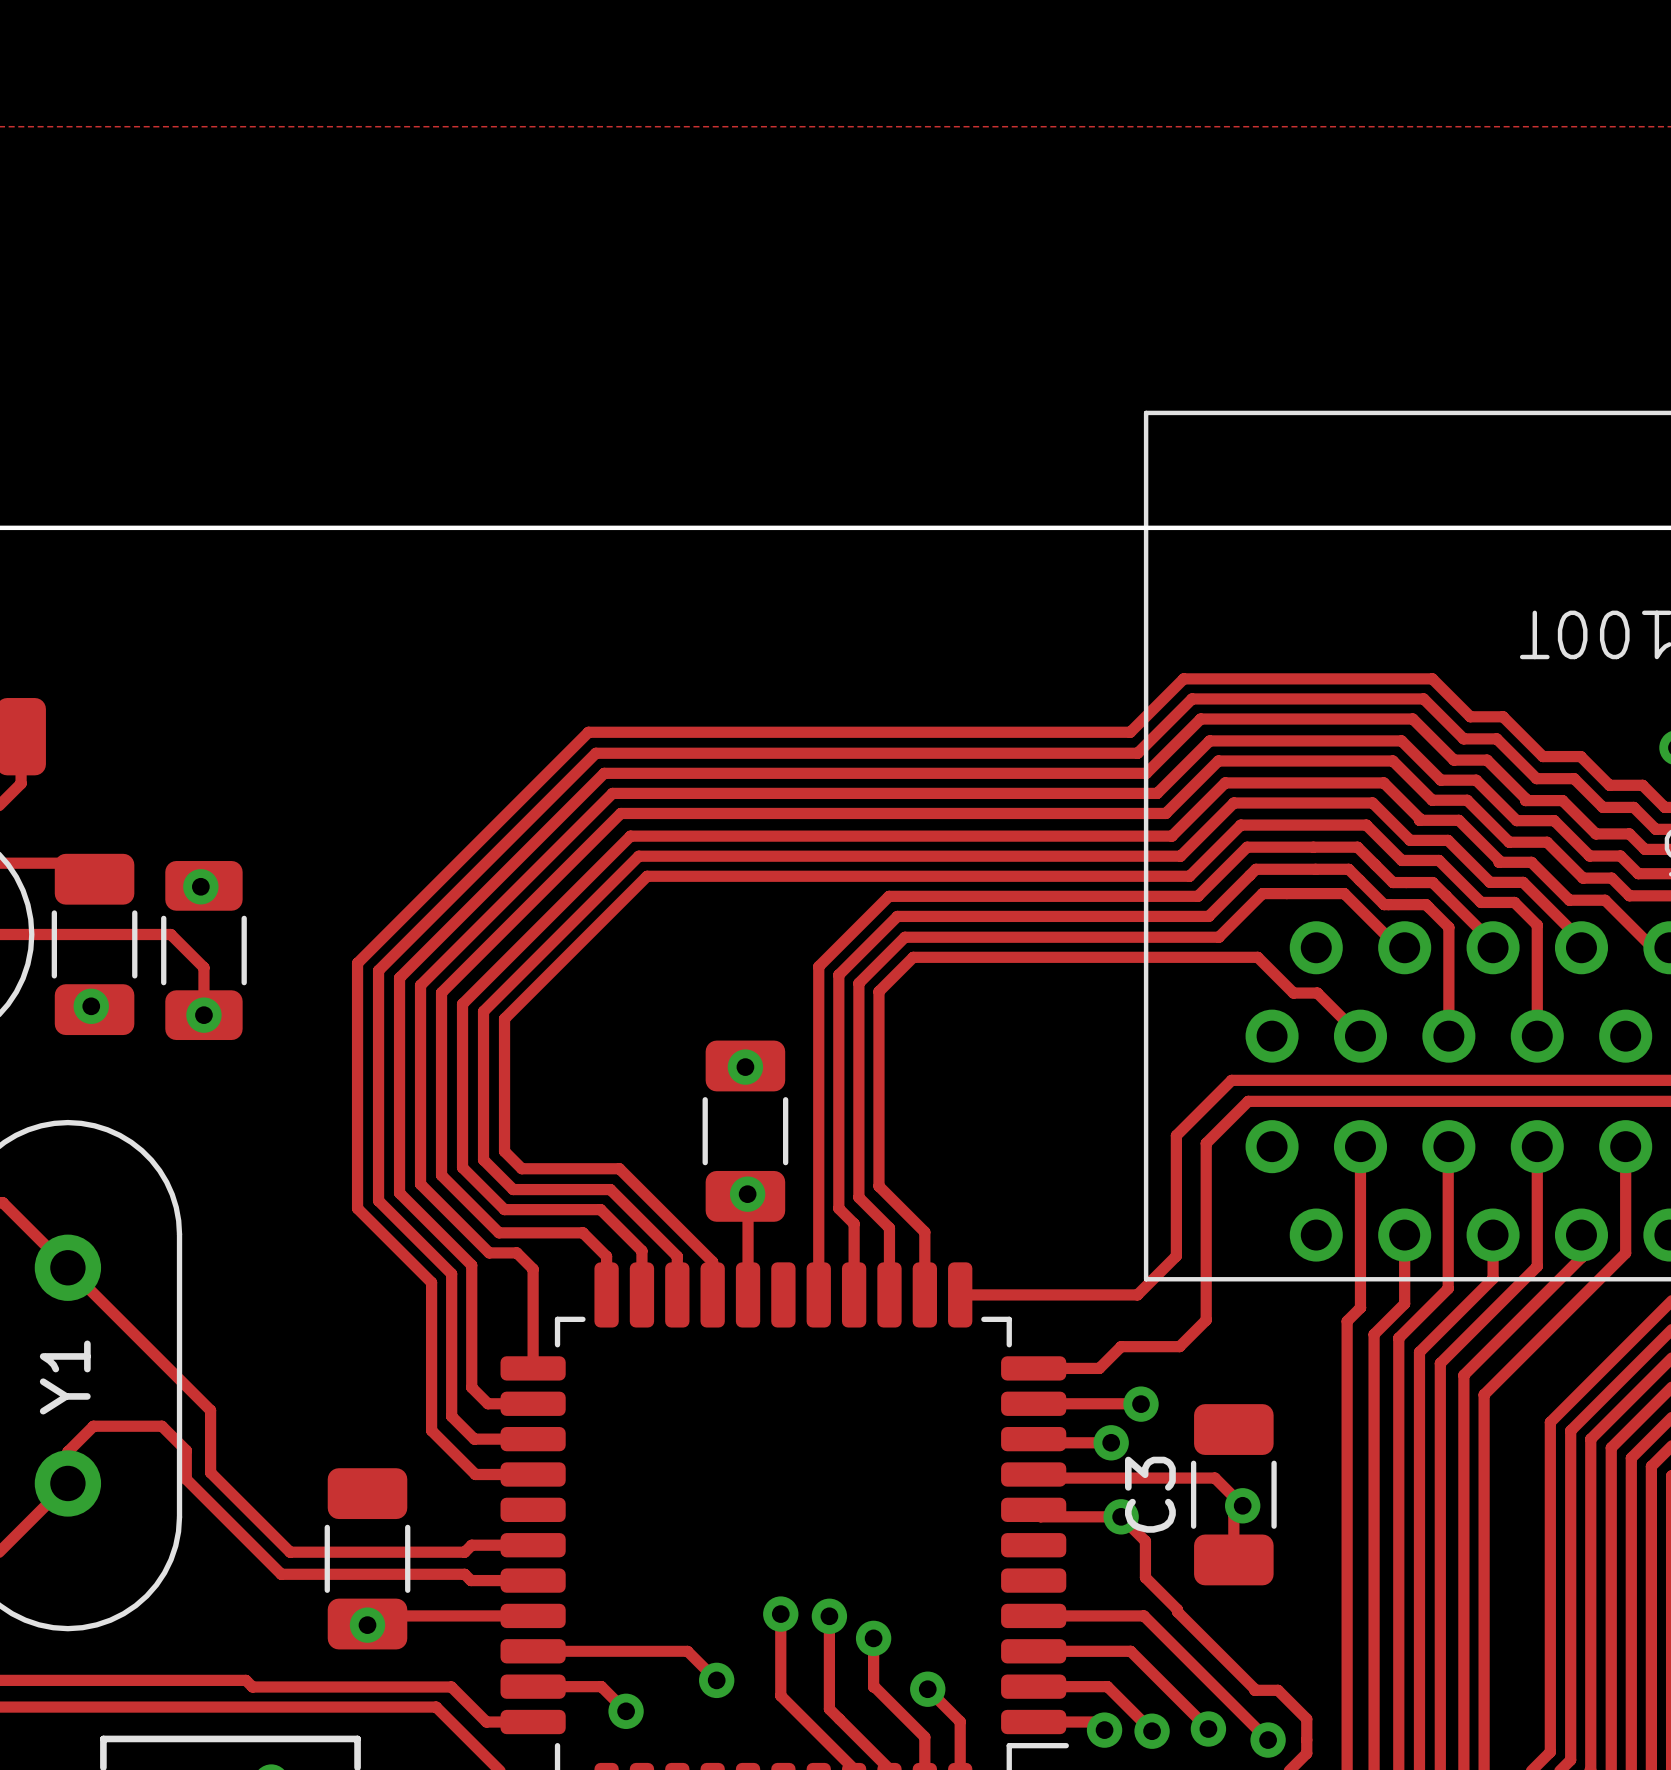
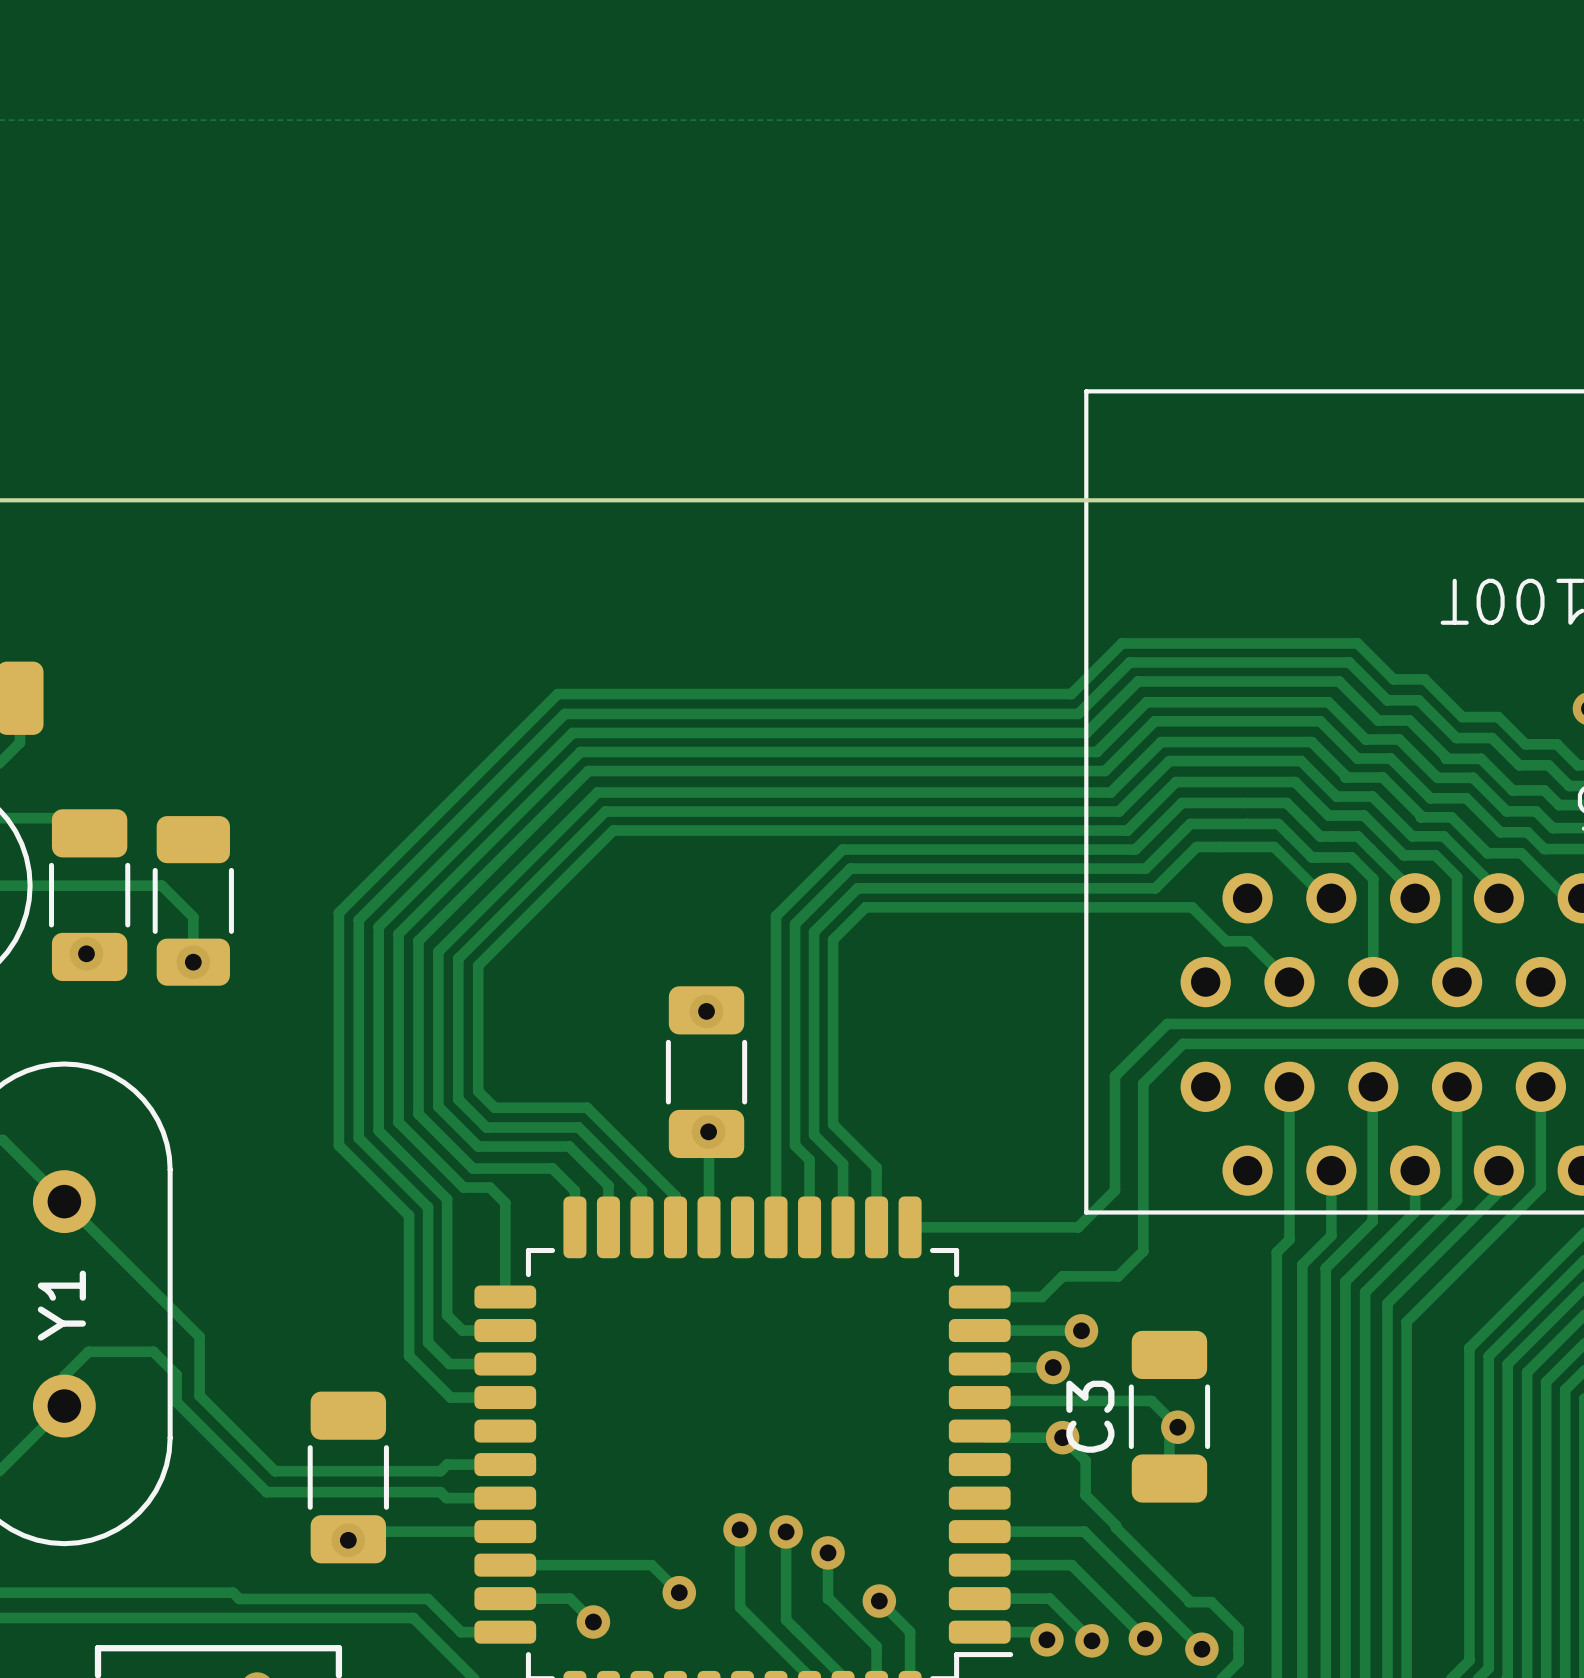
via: (200, 886) -> none

